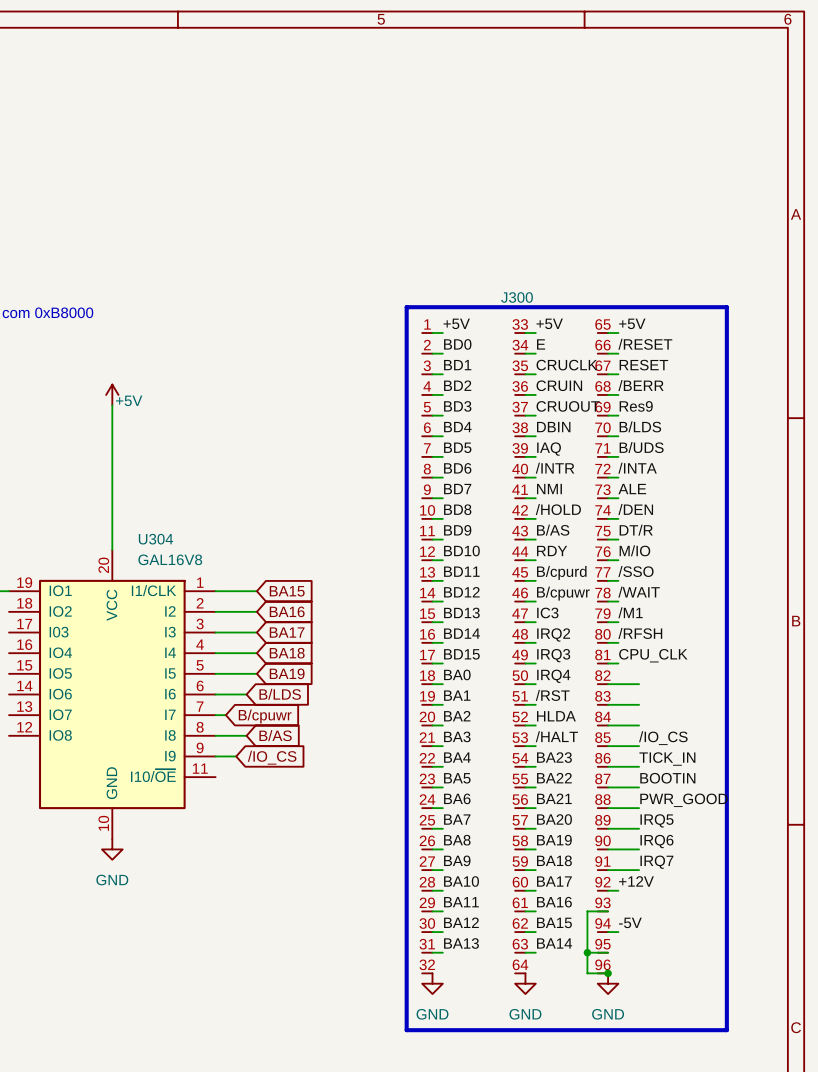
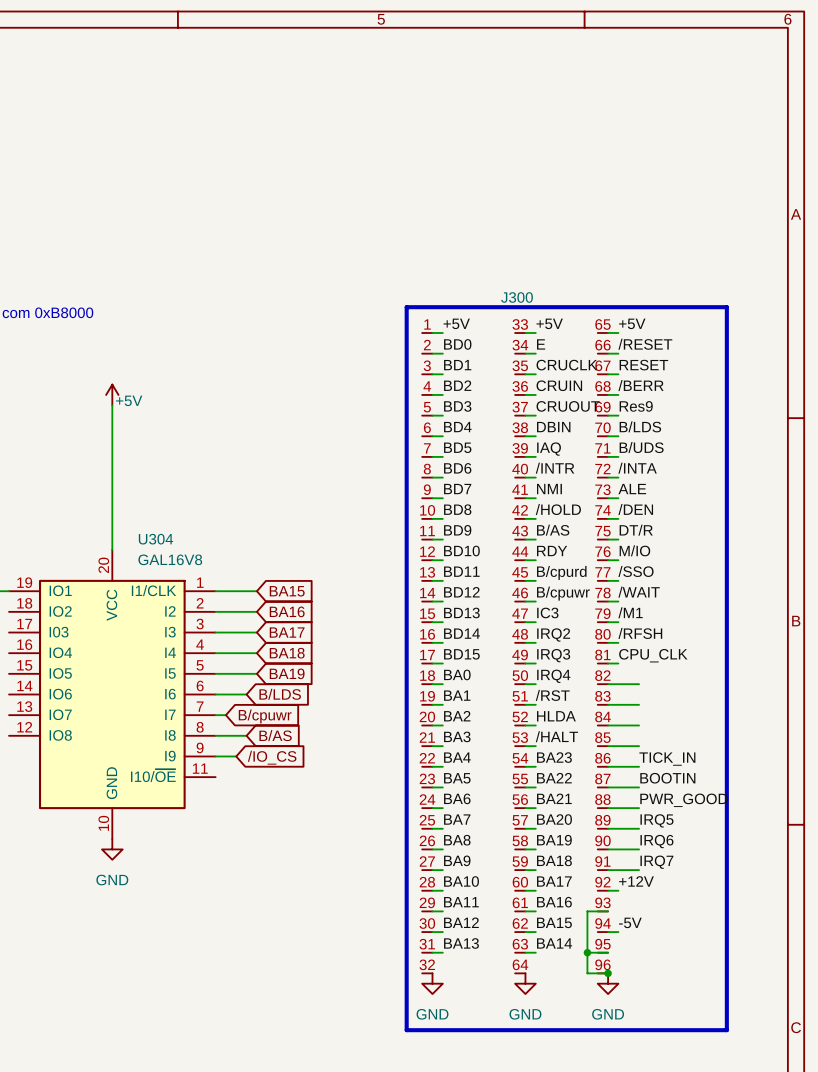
label: /IO_CS (663, 738) -> none

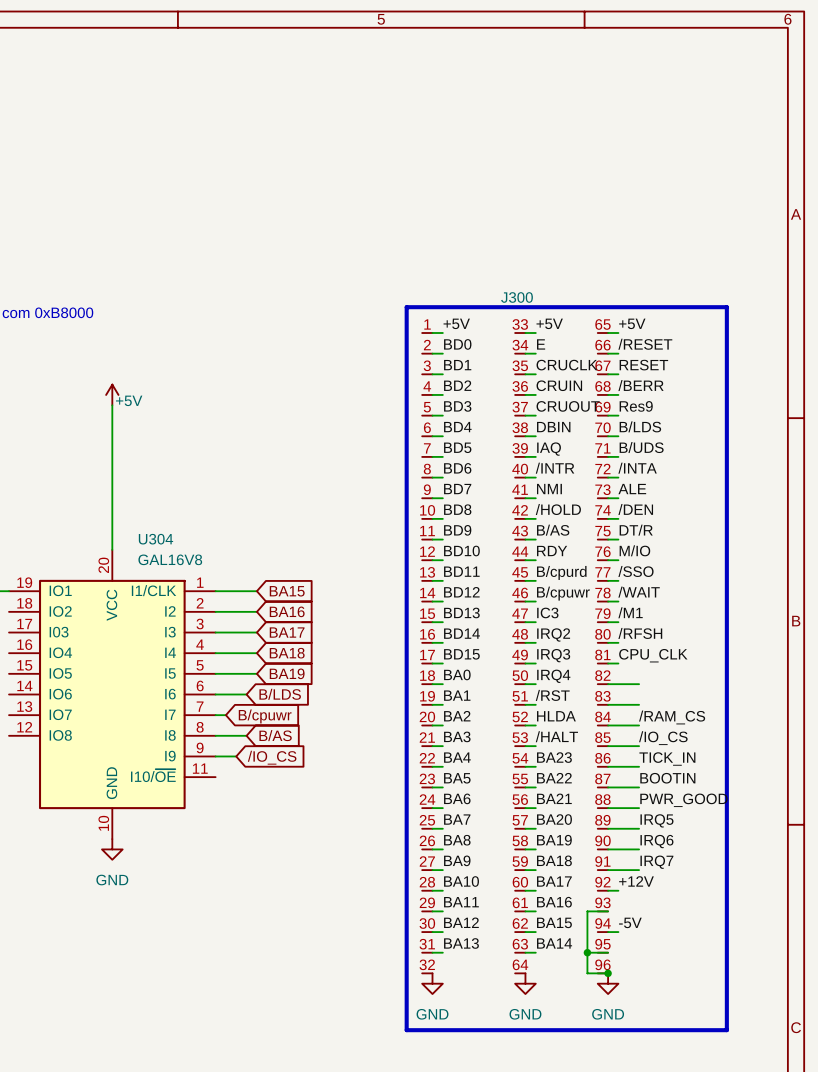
label: none -> /RAM_CS (672, 717)
label: none -> /IO_CS (663, 738)

